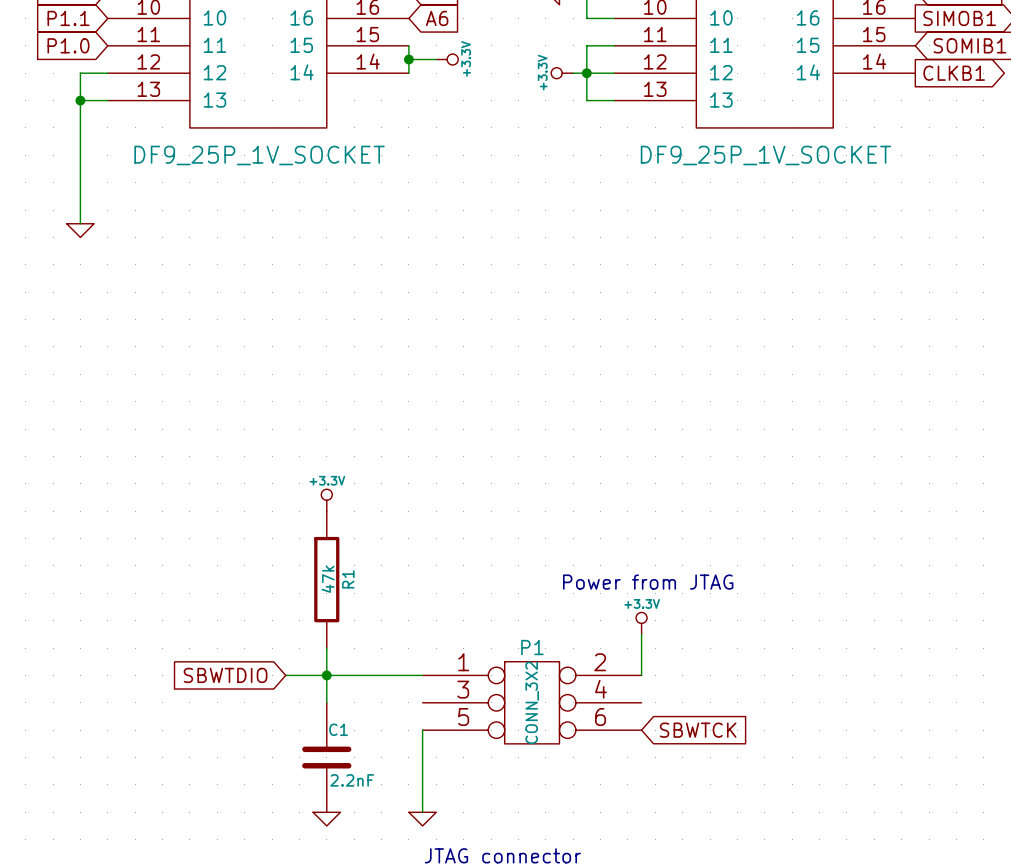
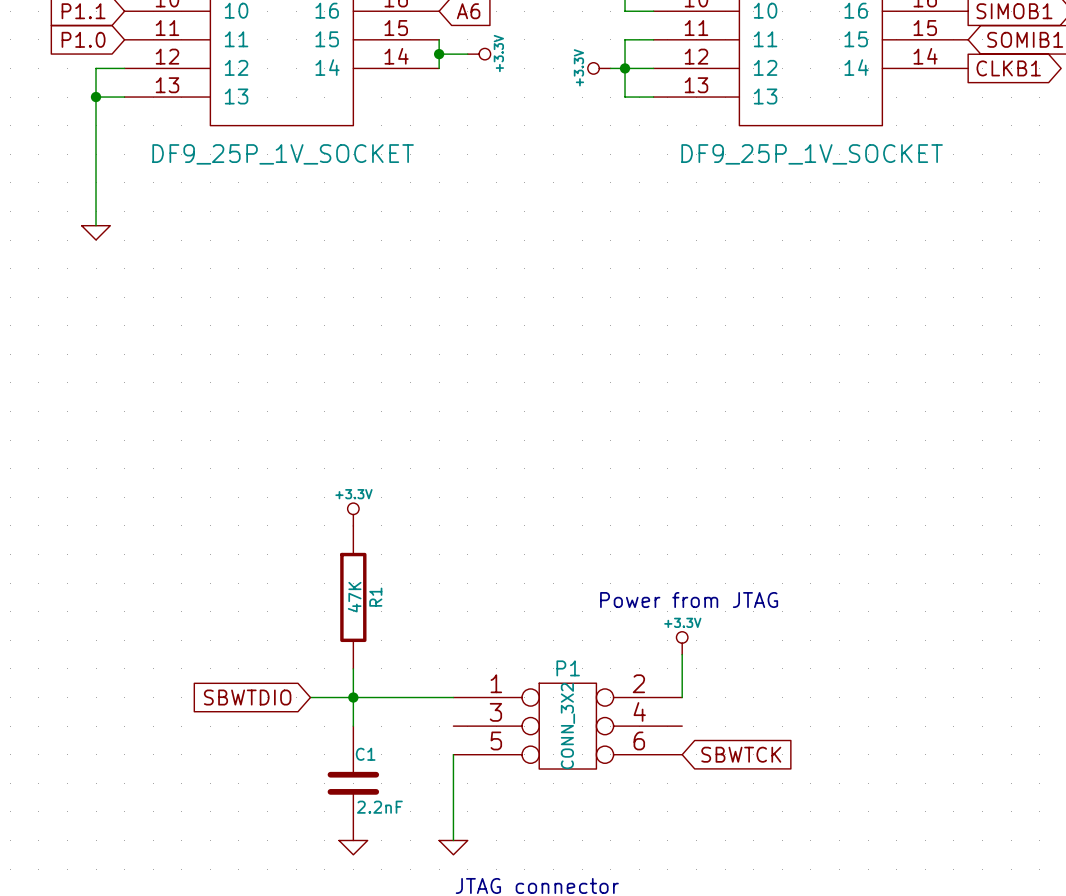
R1 value: 47k (328, 579) -> 47K (354, 597)

